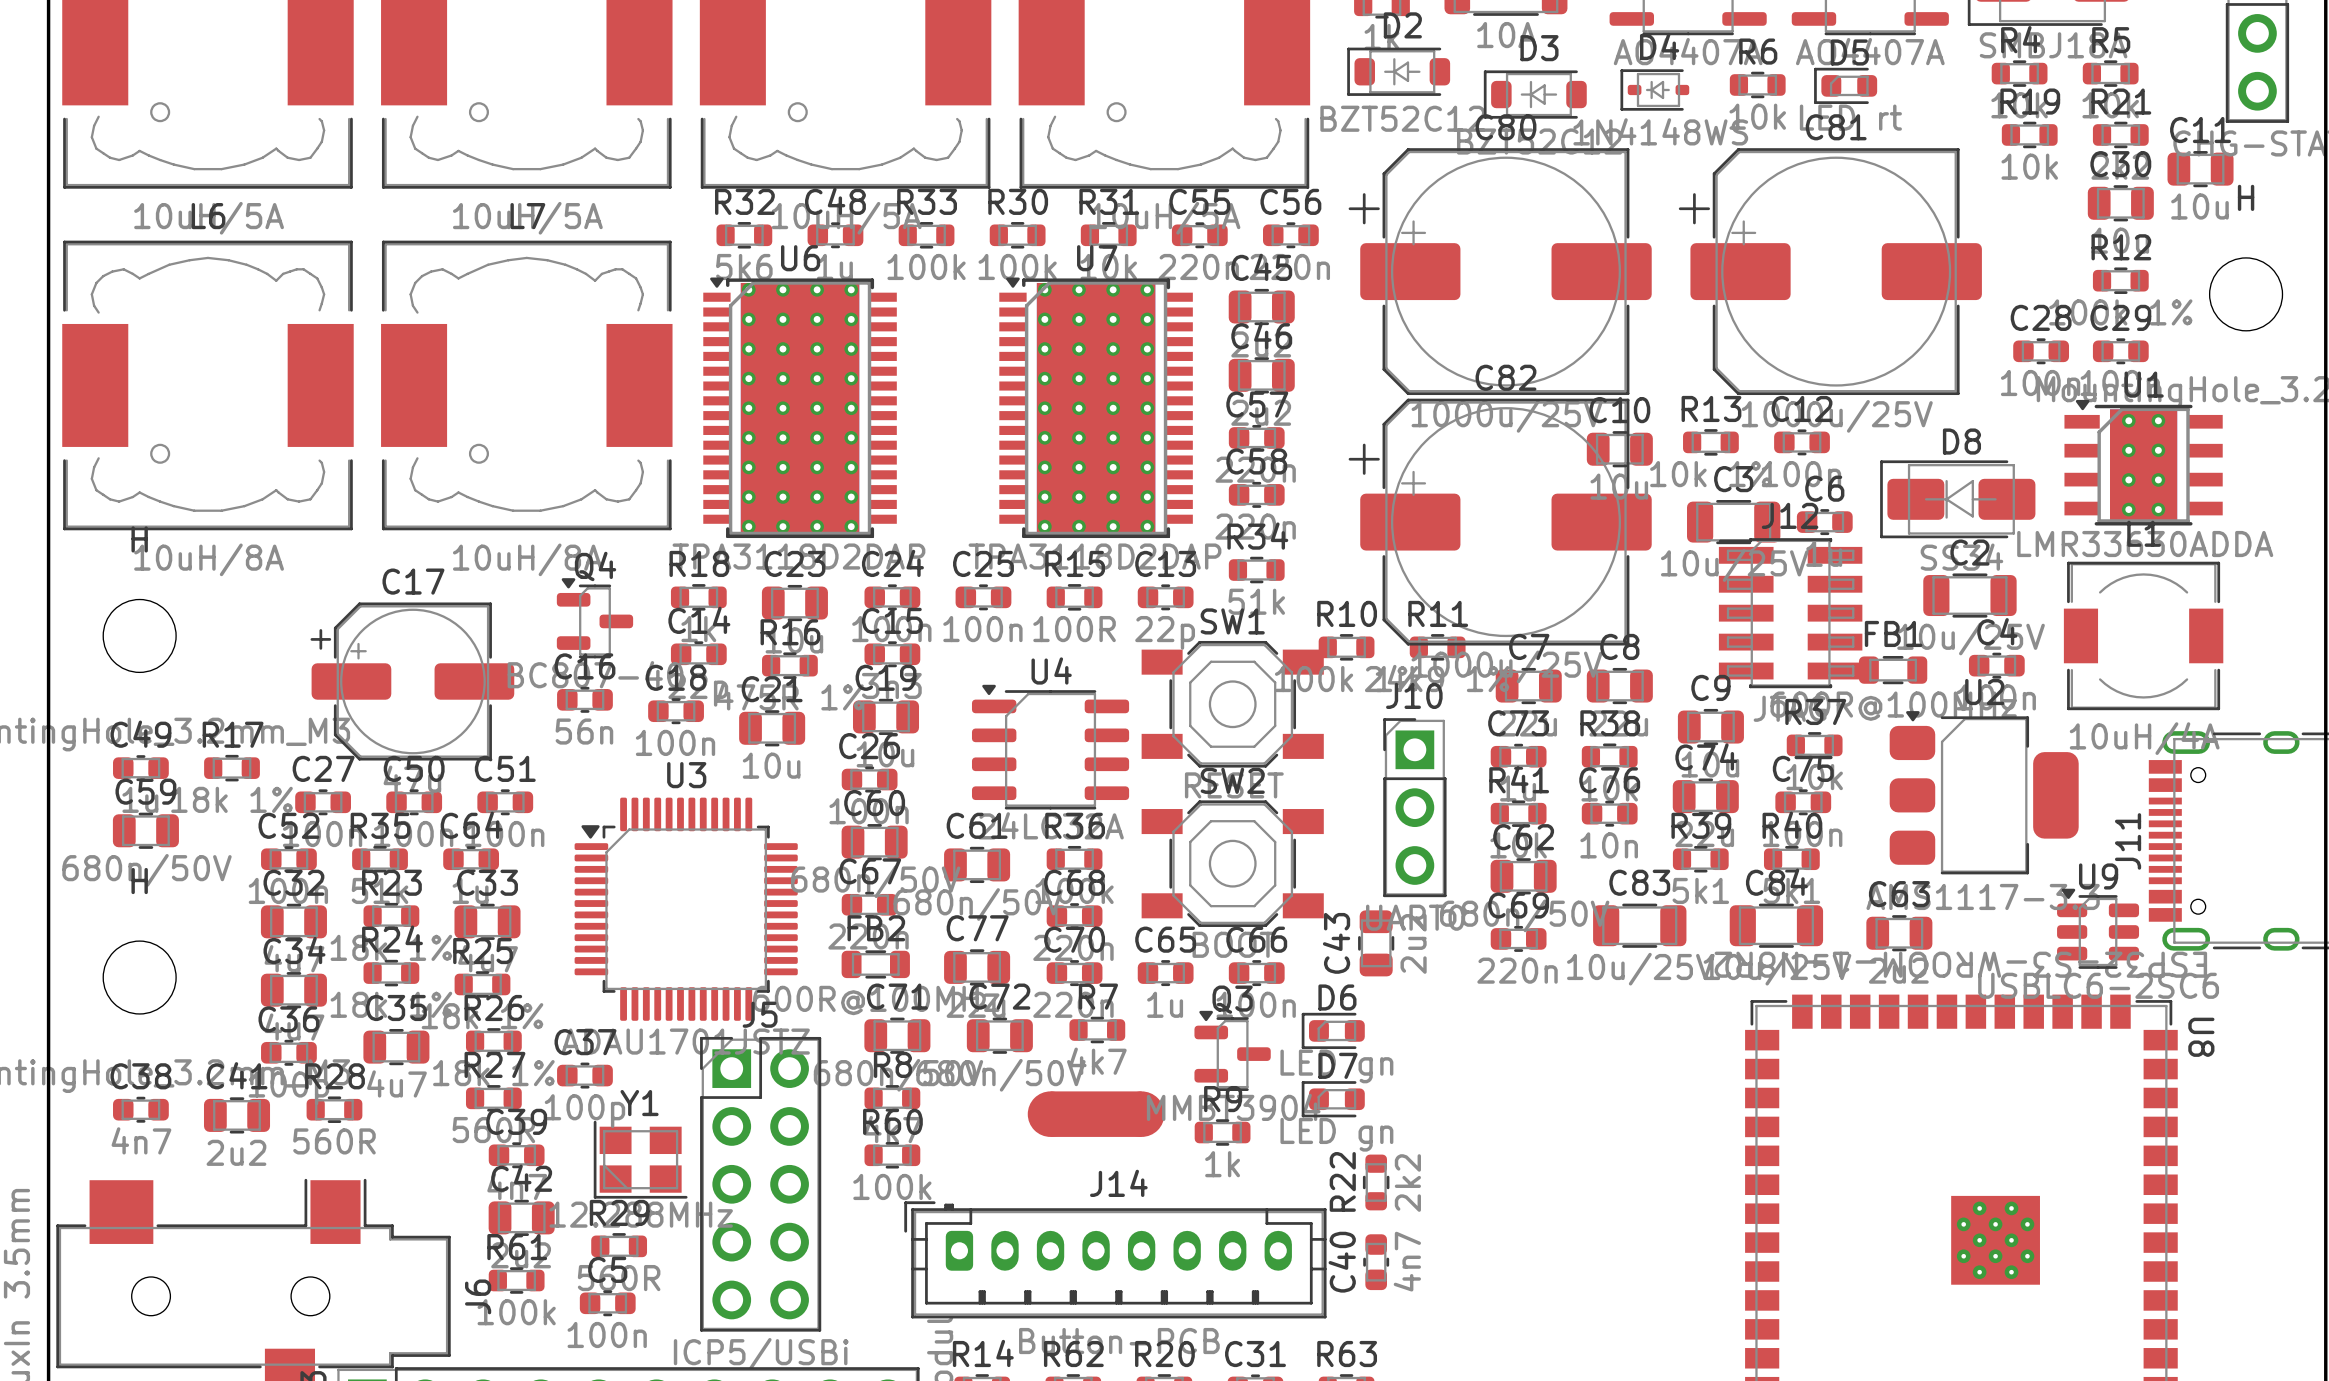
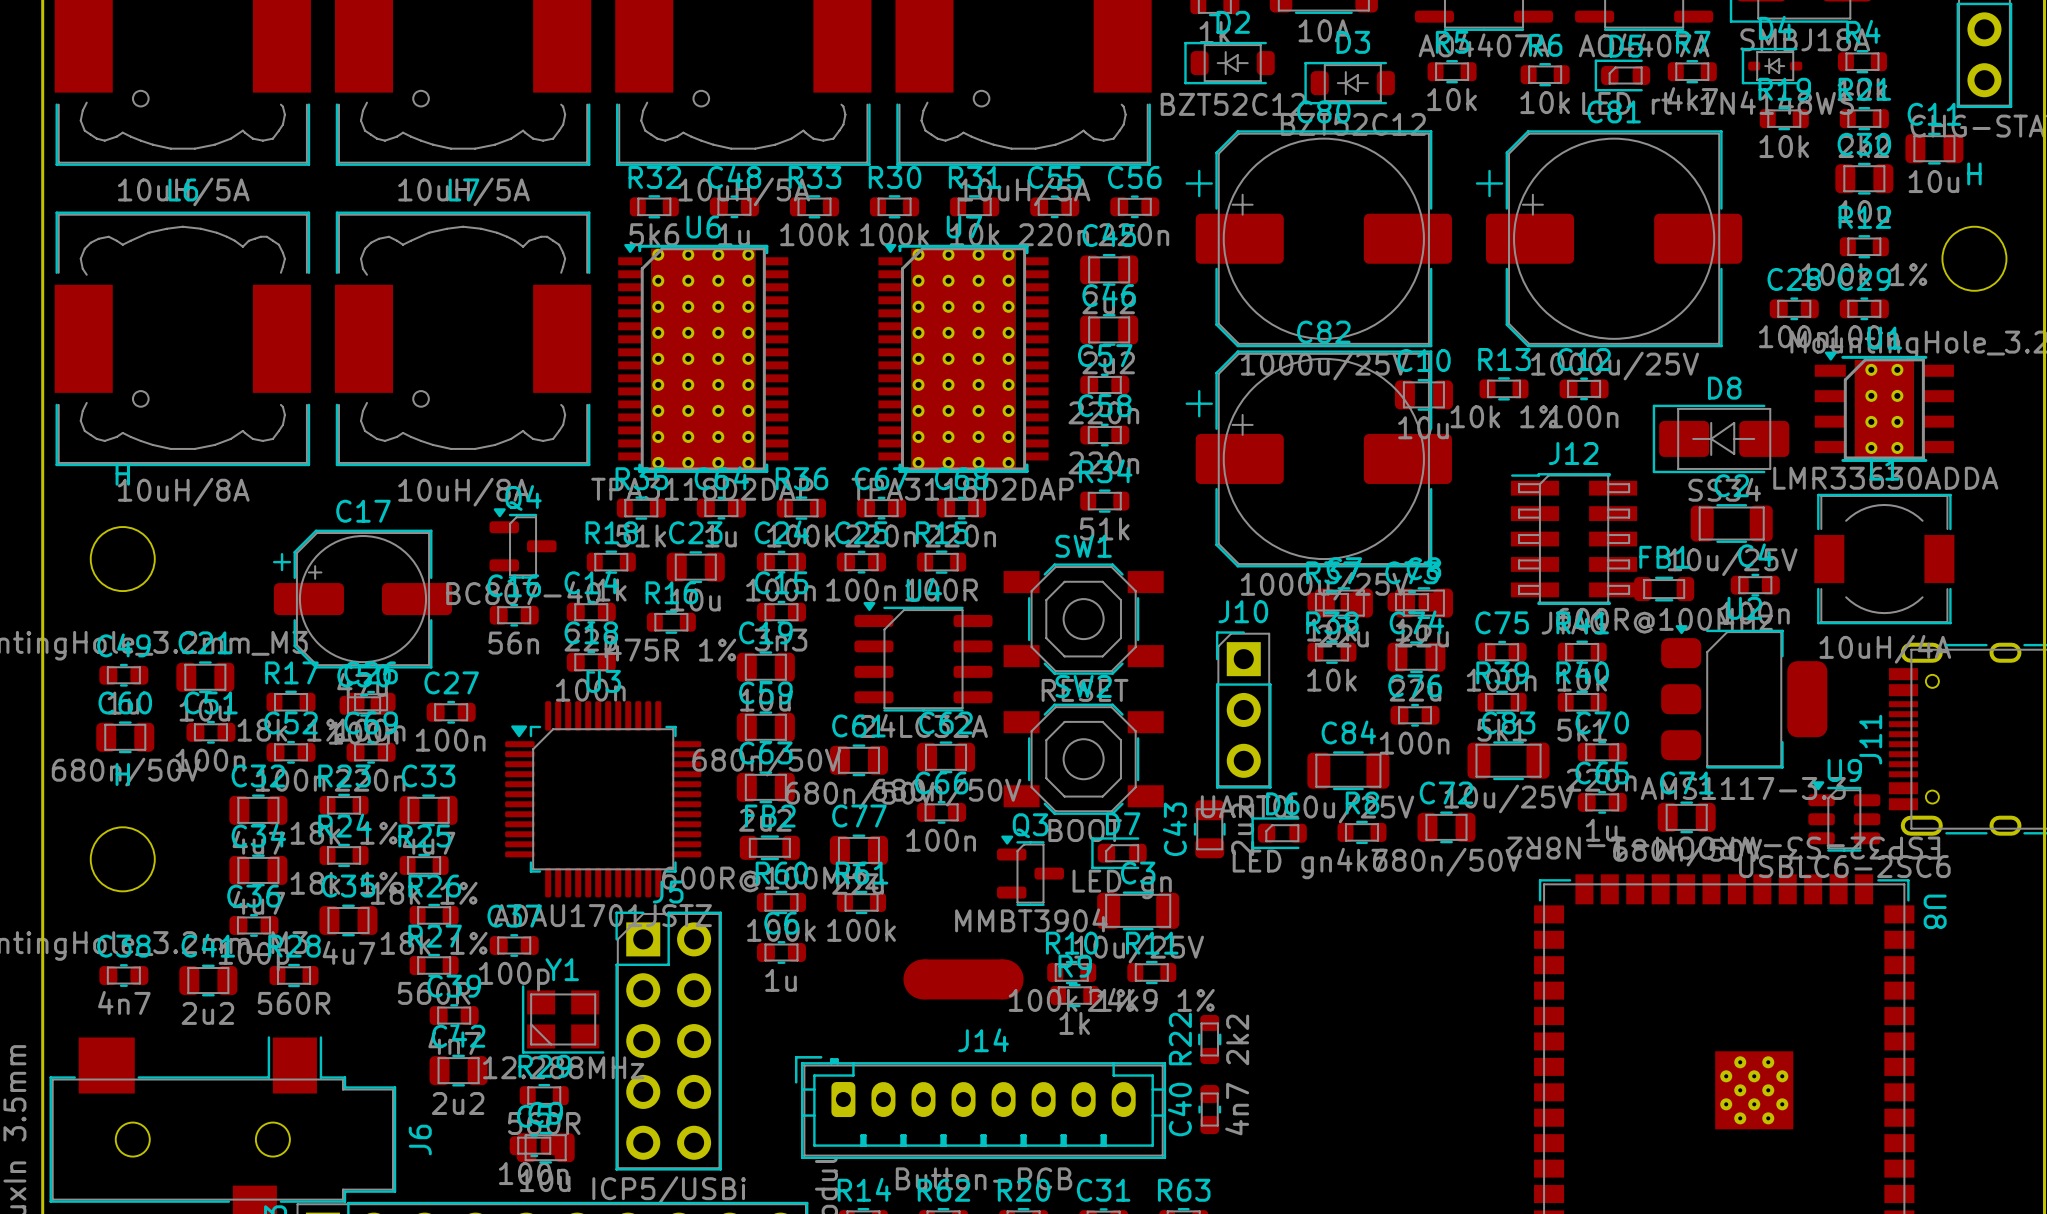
R4 position: (2019, 73) -> (1862, 61)
R5 position: (2110, 73) -> (1452, 71)
D4 position: (1654, 89) -> (1772, 66)
C3 position: (1733, 522) -> (1138, 910)
C6 position: (1824, 522) -> (781, 952)
R18 position: (698, 597) -> (611, 562)
C24 position: (892, 597) -> (781, 562)
C25 position: (983, 597) -> (861, 562)
R15 position: (1074, 597) -> (941, 562)
C13: 22p (1165, 597) -> none
C23 position: (794, 603) -> (695, 567)
R10 position: (1346, 647) -> (1071, 972)
R11 position: (1437, 647) -> (1151, 972)
C14 position: (698, 654) -> (591, 612)
C15 position: (892, 654) -> (781, 612)
R16 position: (789, 665) -> (671, 622)
C18 position: (676, 711) -> (591, 662)
C19 position: (886, 716) -> (765, 667)
C9 position: (1710, 727) -> (545, 1147)
C21 position: (772, 728) -> (205, 677)
R37 position: (1814, 745) -> (1331, 602)
C73 position: (1518, 756) -> (1412, 602)
R38 position: (1609, 756) -> (1331, 652)
R17 position: (232, 768) -> (291, 702)
C26 position: (869, 779) -> (371, 702)
C74 position: (1705, 796) -> (1416, 657)
C27 position: (323, 802) -> (451, 712)
C51 position: (505, 802) -> (210, 732)
C75 position: (1803, 802) -> (1502, 652)
R41 position: (1518, 813) -> (1582, 652)
C59 position: (145, 830) -> (765, 727)
C60 position: (874, 842) -> (125, 737)
C76 value: 10n (1609, 845) -> 100n (1414, 743)
C52 position: (288, 859) -> (291, 752)
R35 position: (380, 859) -> (641, 508)
C64 position: (471, 859) -> (721, 508)
R36 position: (1074, 859) -> (801, 508)
R39 position: (1700, 859) -> (1502, 702)
R40 position: (1791, 859) -> (1582, 702)
C62 position: (1523, 876) -> (946, 757)
C67 position: (869, 904) -> (881, 508)
C68 position: (1074, 916) -> (961, 508)
C83 position: (1639, 925) -> (1508, 760)
C84 position: (1776, 925) -> (1348, 770)
C63 position: (1899, 933) -> (765, 787)
C69 position: (1518, 938) -> (371, 752)
C70 position: (1074, 973) -> (1602, 752)
C65 position: (1165, 973) -> (1602, 802)
C66 position: (1256, 973) -> (941, 812)
R7 position: (1097, 1030) -> (1692, 71)
D6 position: (1333, 1030) -> (1279, 833)
C71 position: (897, 1035) -> (1686, 817)
C72 position: (999, 1035) -> (1446, 827)
Q3 position: (1232, 1050) -> (1030, 870)
R8 position: (892, 1098) -> (1361, 832)
D7 position: (1333, 1099) -> (1118, 853)
R60 position: (892, 1155) -> (781, 902)
R61 position: (516, 1280) -> (861, 902)

